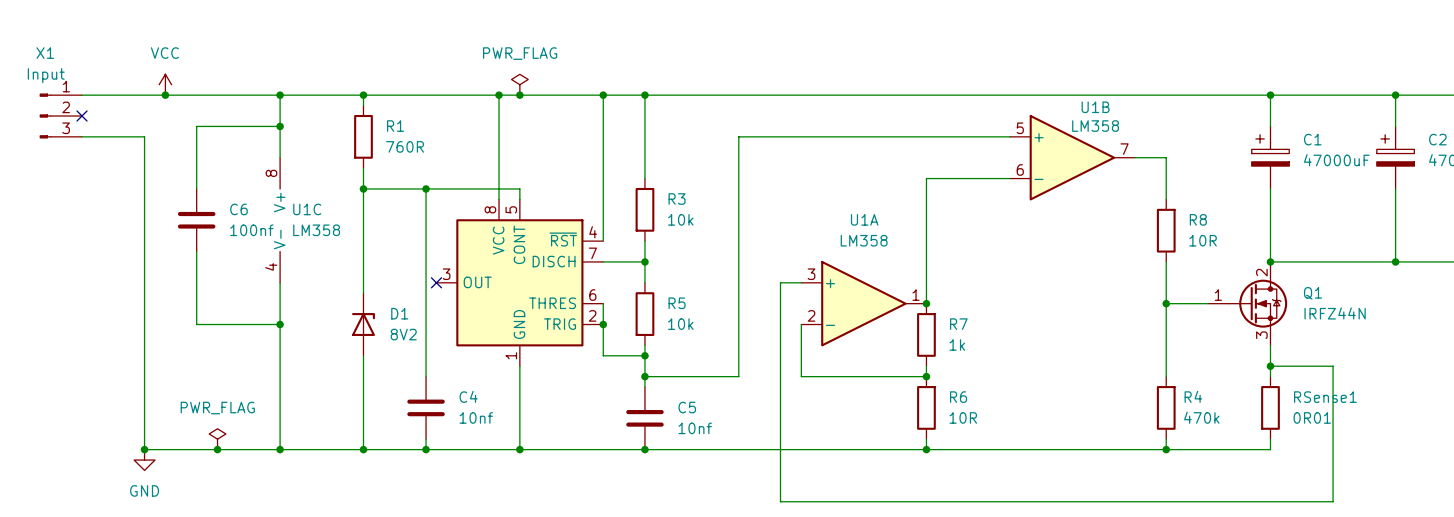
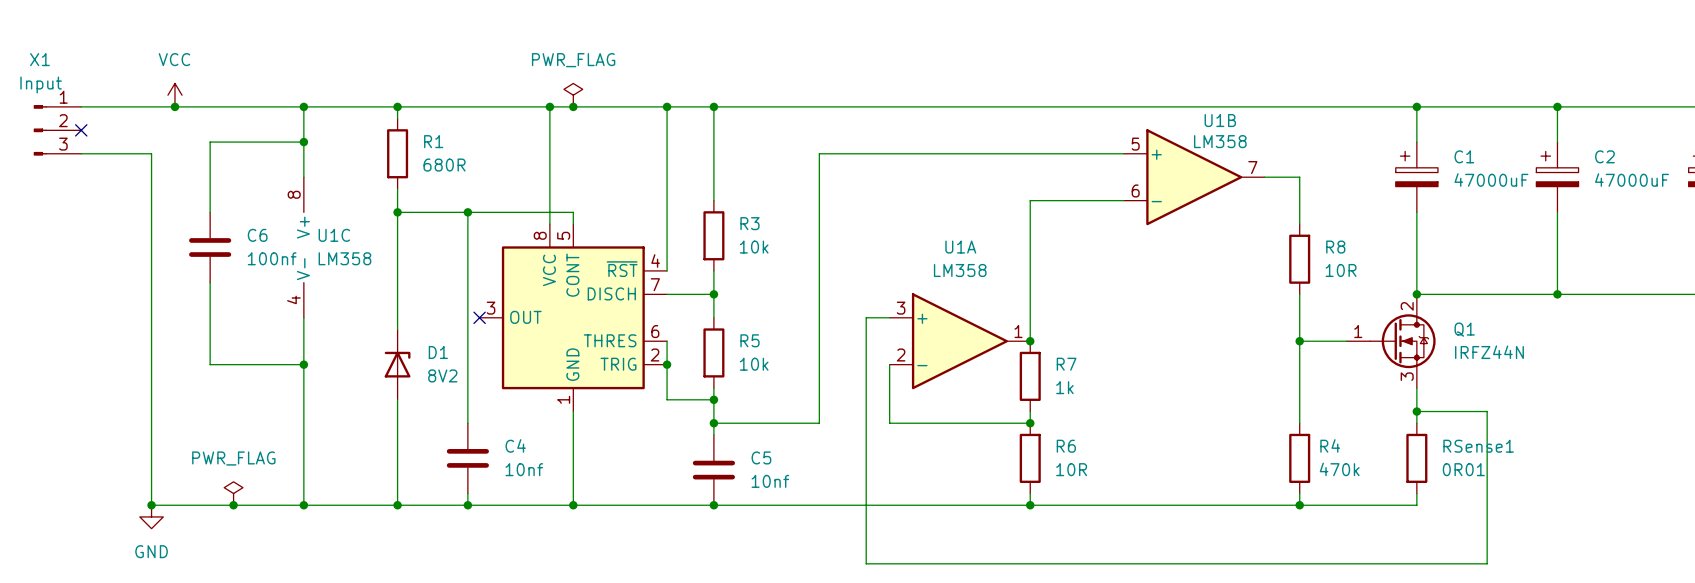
R1 value: 760R (405, 146) -> 680R (444, 165)

